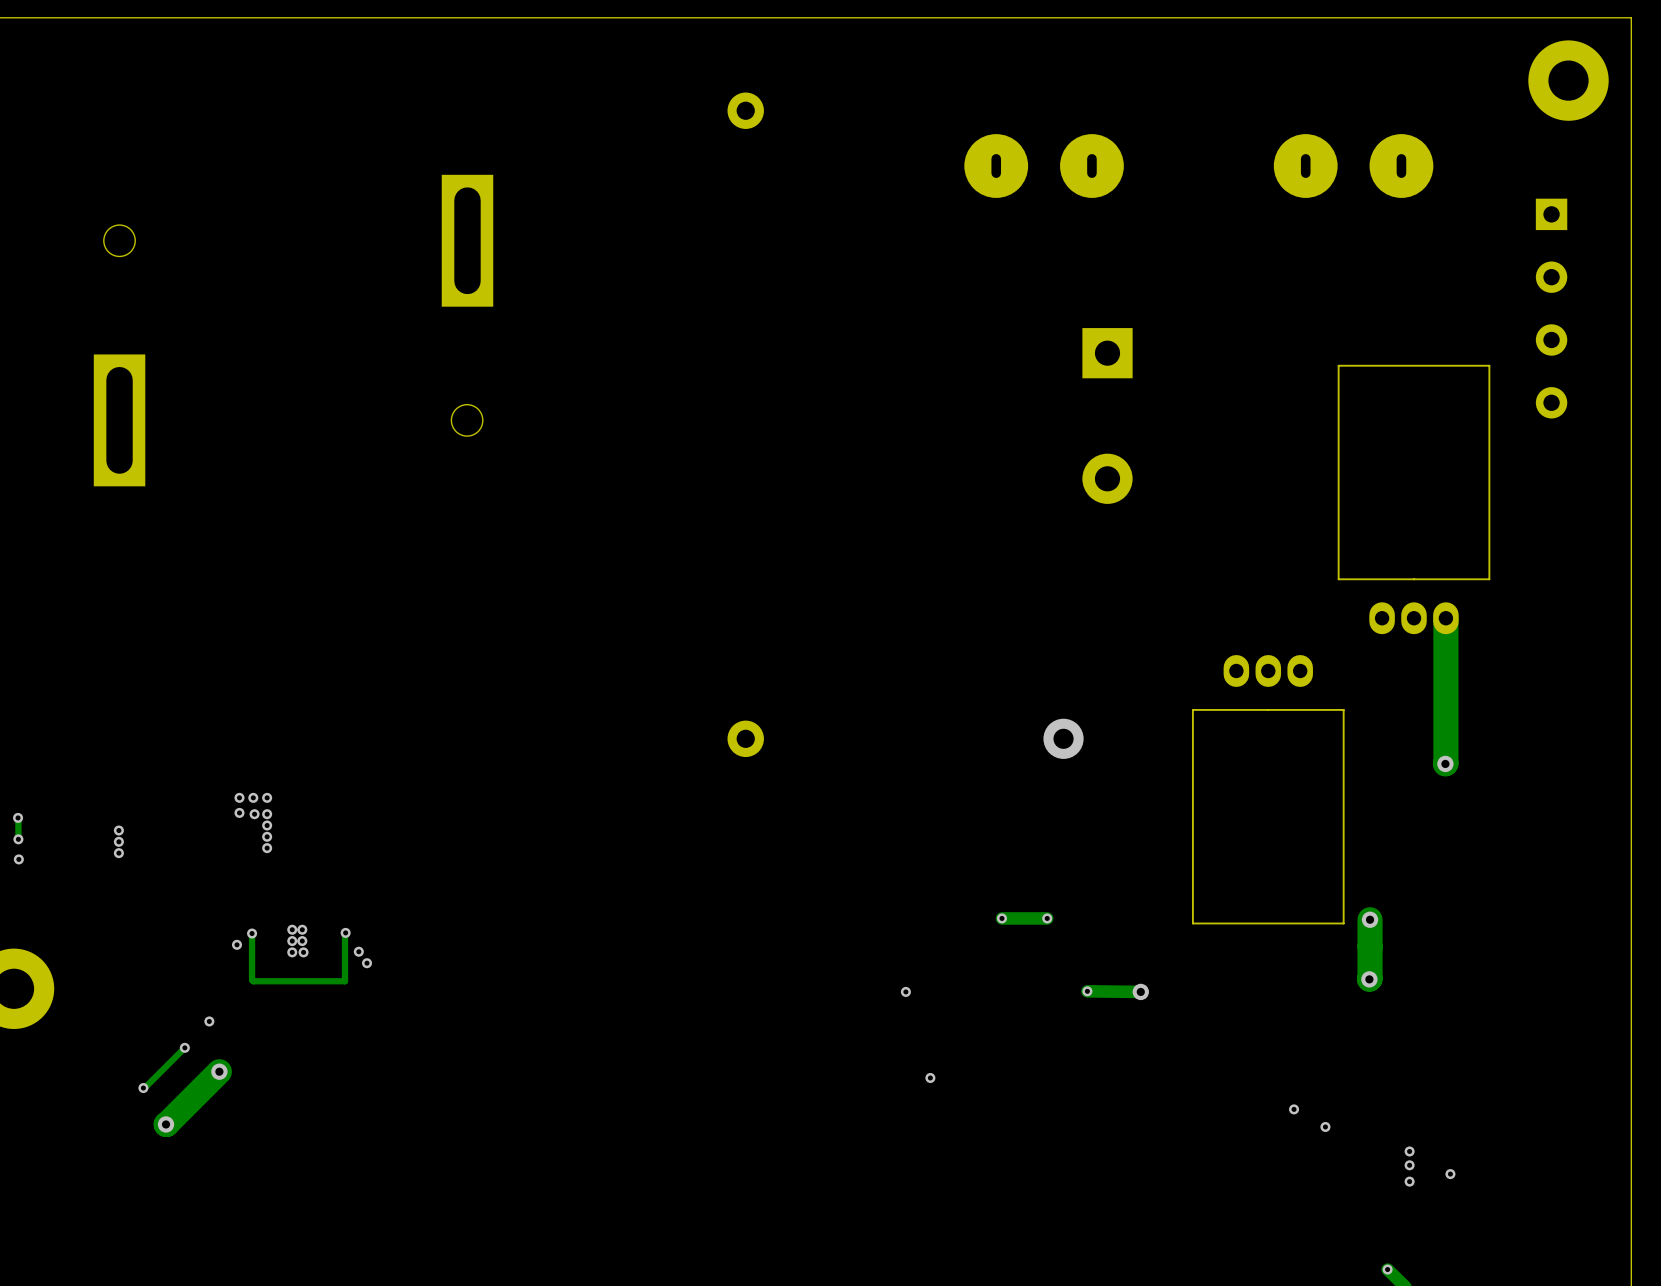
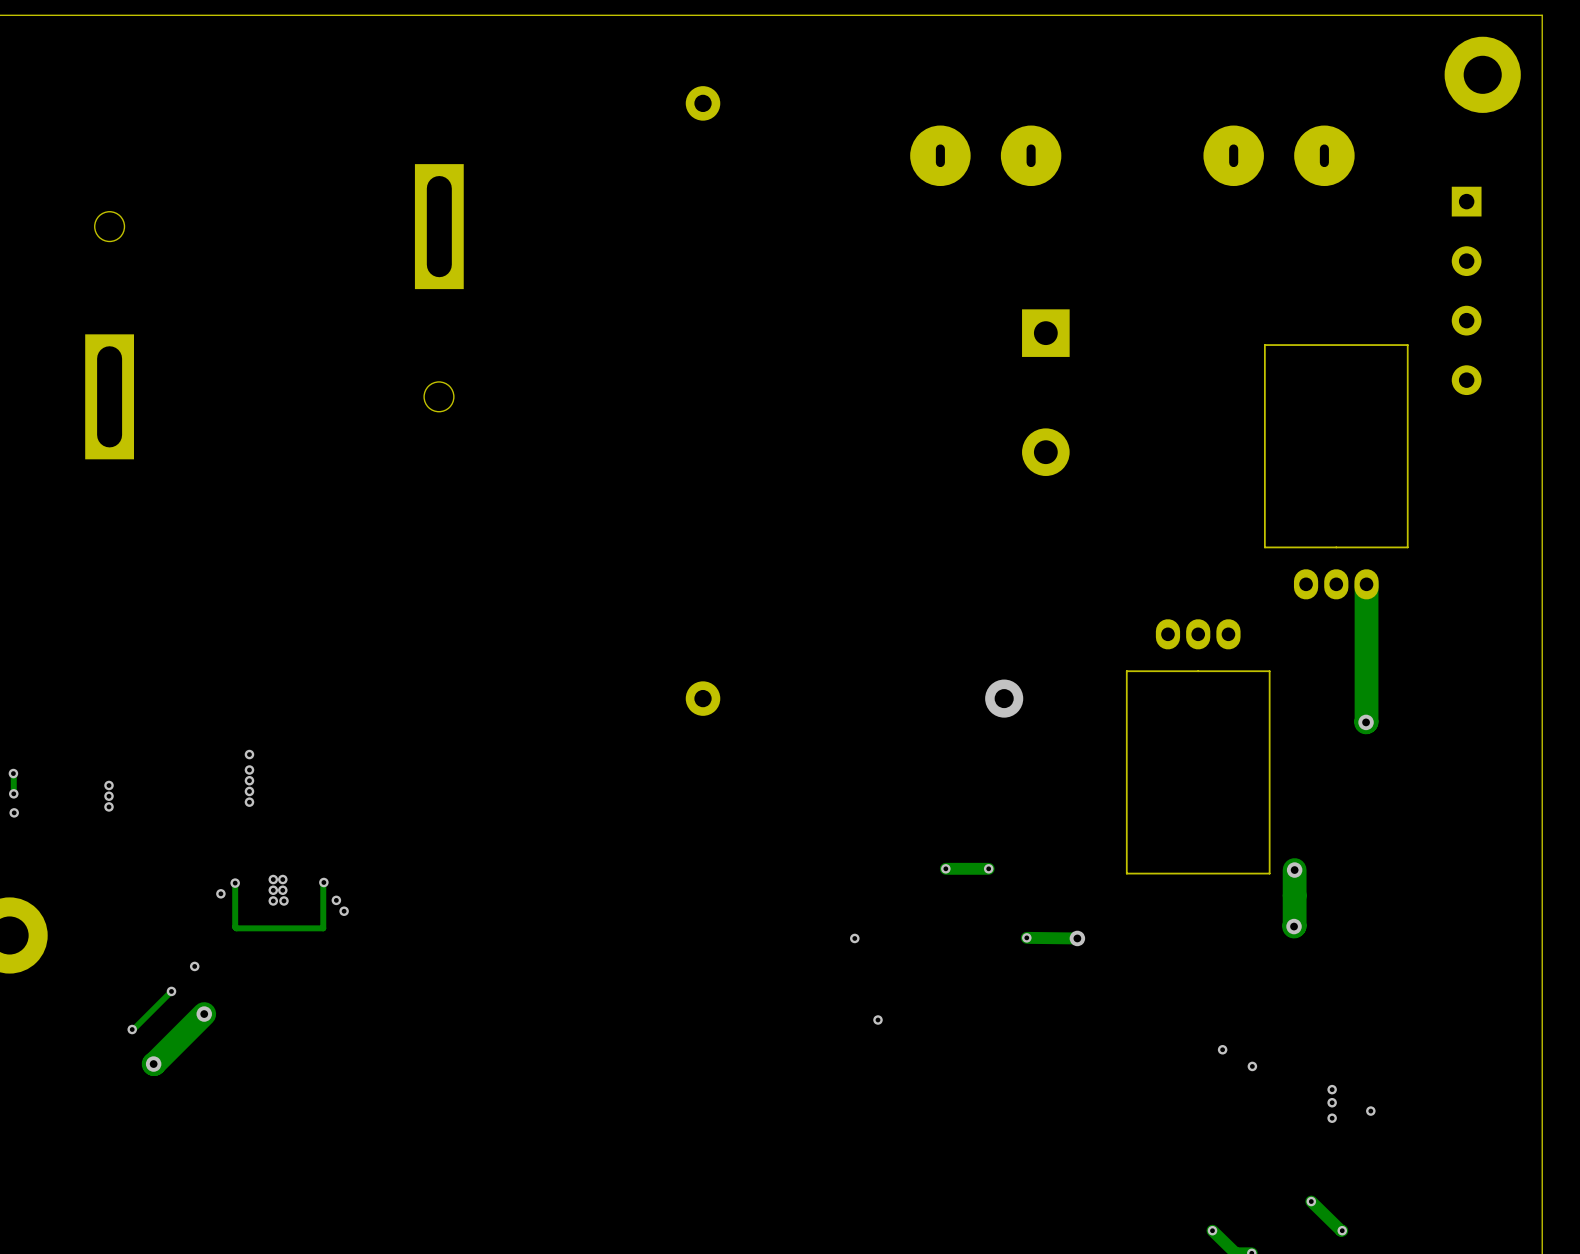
via: (239, 797) -> none
via: (253, 797) -> none
via: (239, 812) -> none
via: (254, 814) -> none

